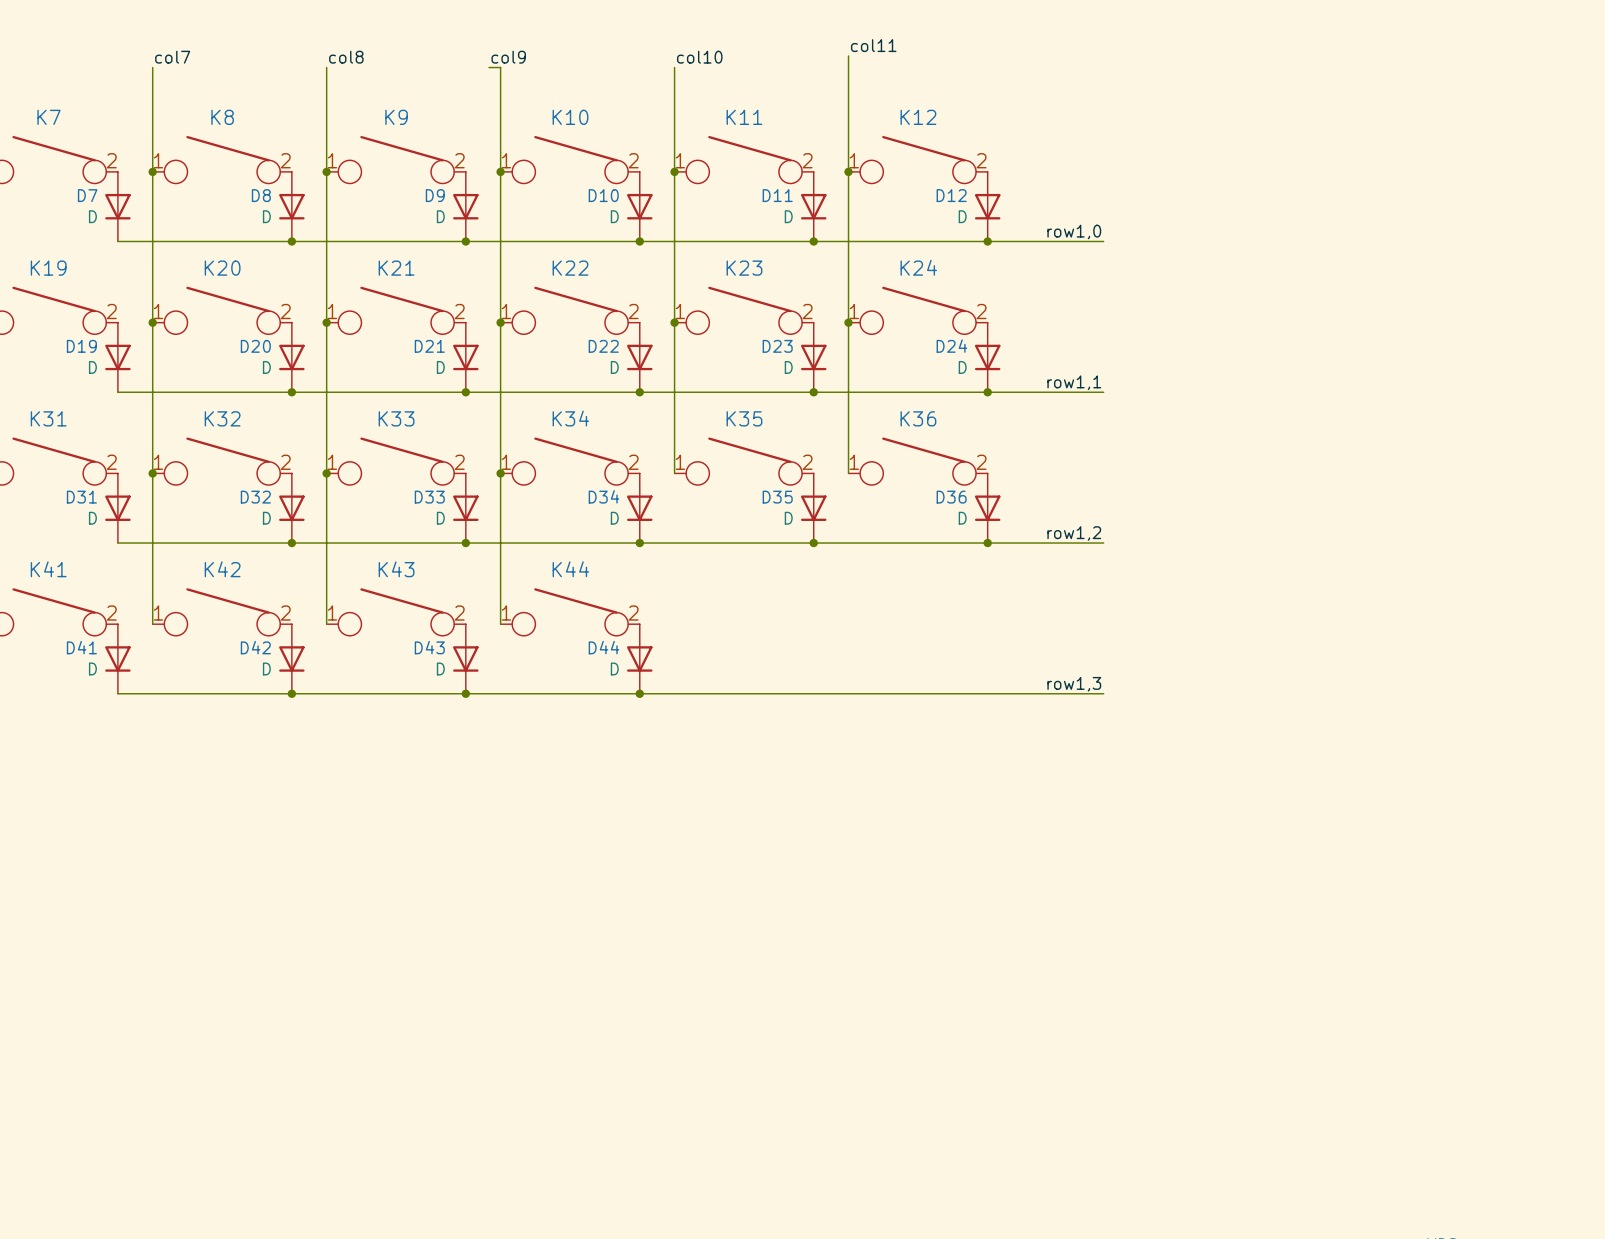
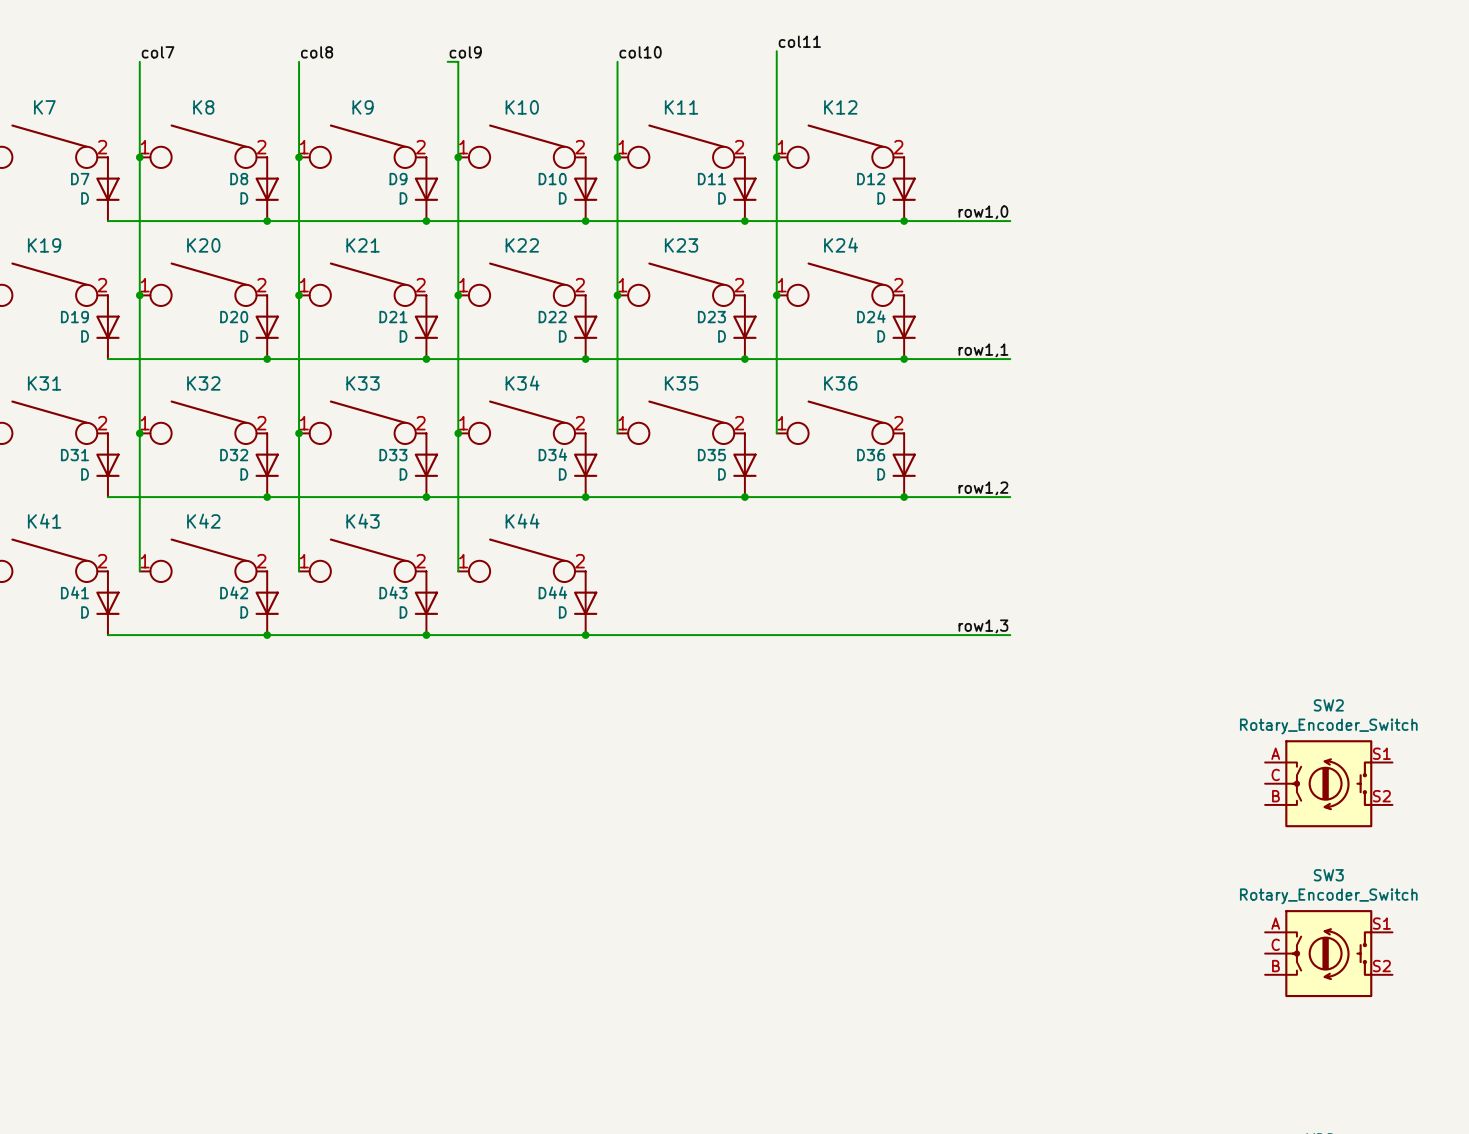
SW2: none -> Rotary_Encoder_Switch (1328, 783)
SW3: none -> Rotary_Encoder_Switch (1328, 953)

